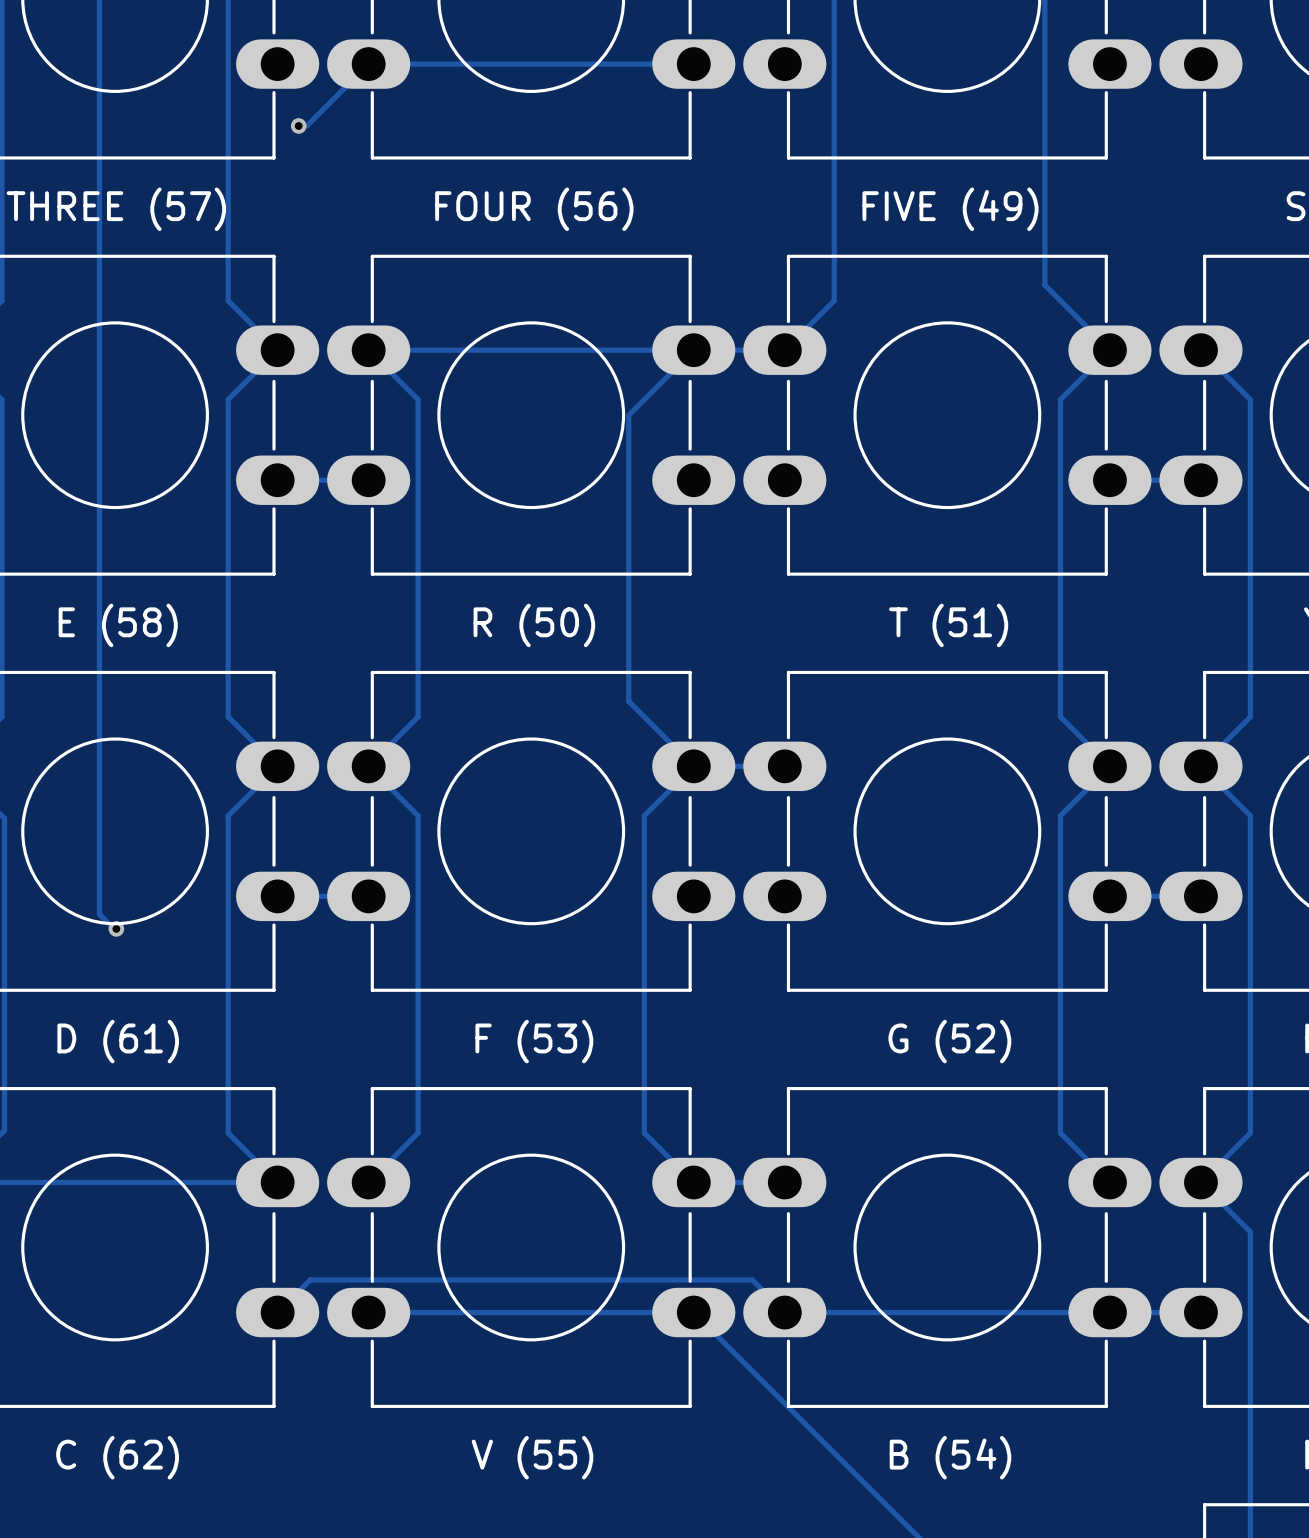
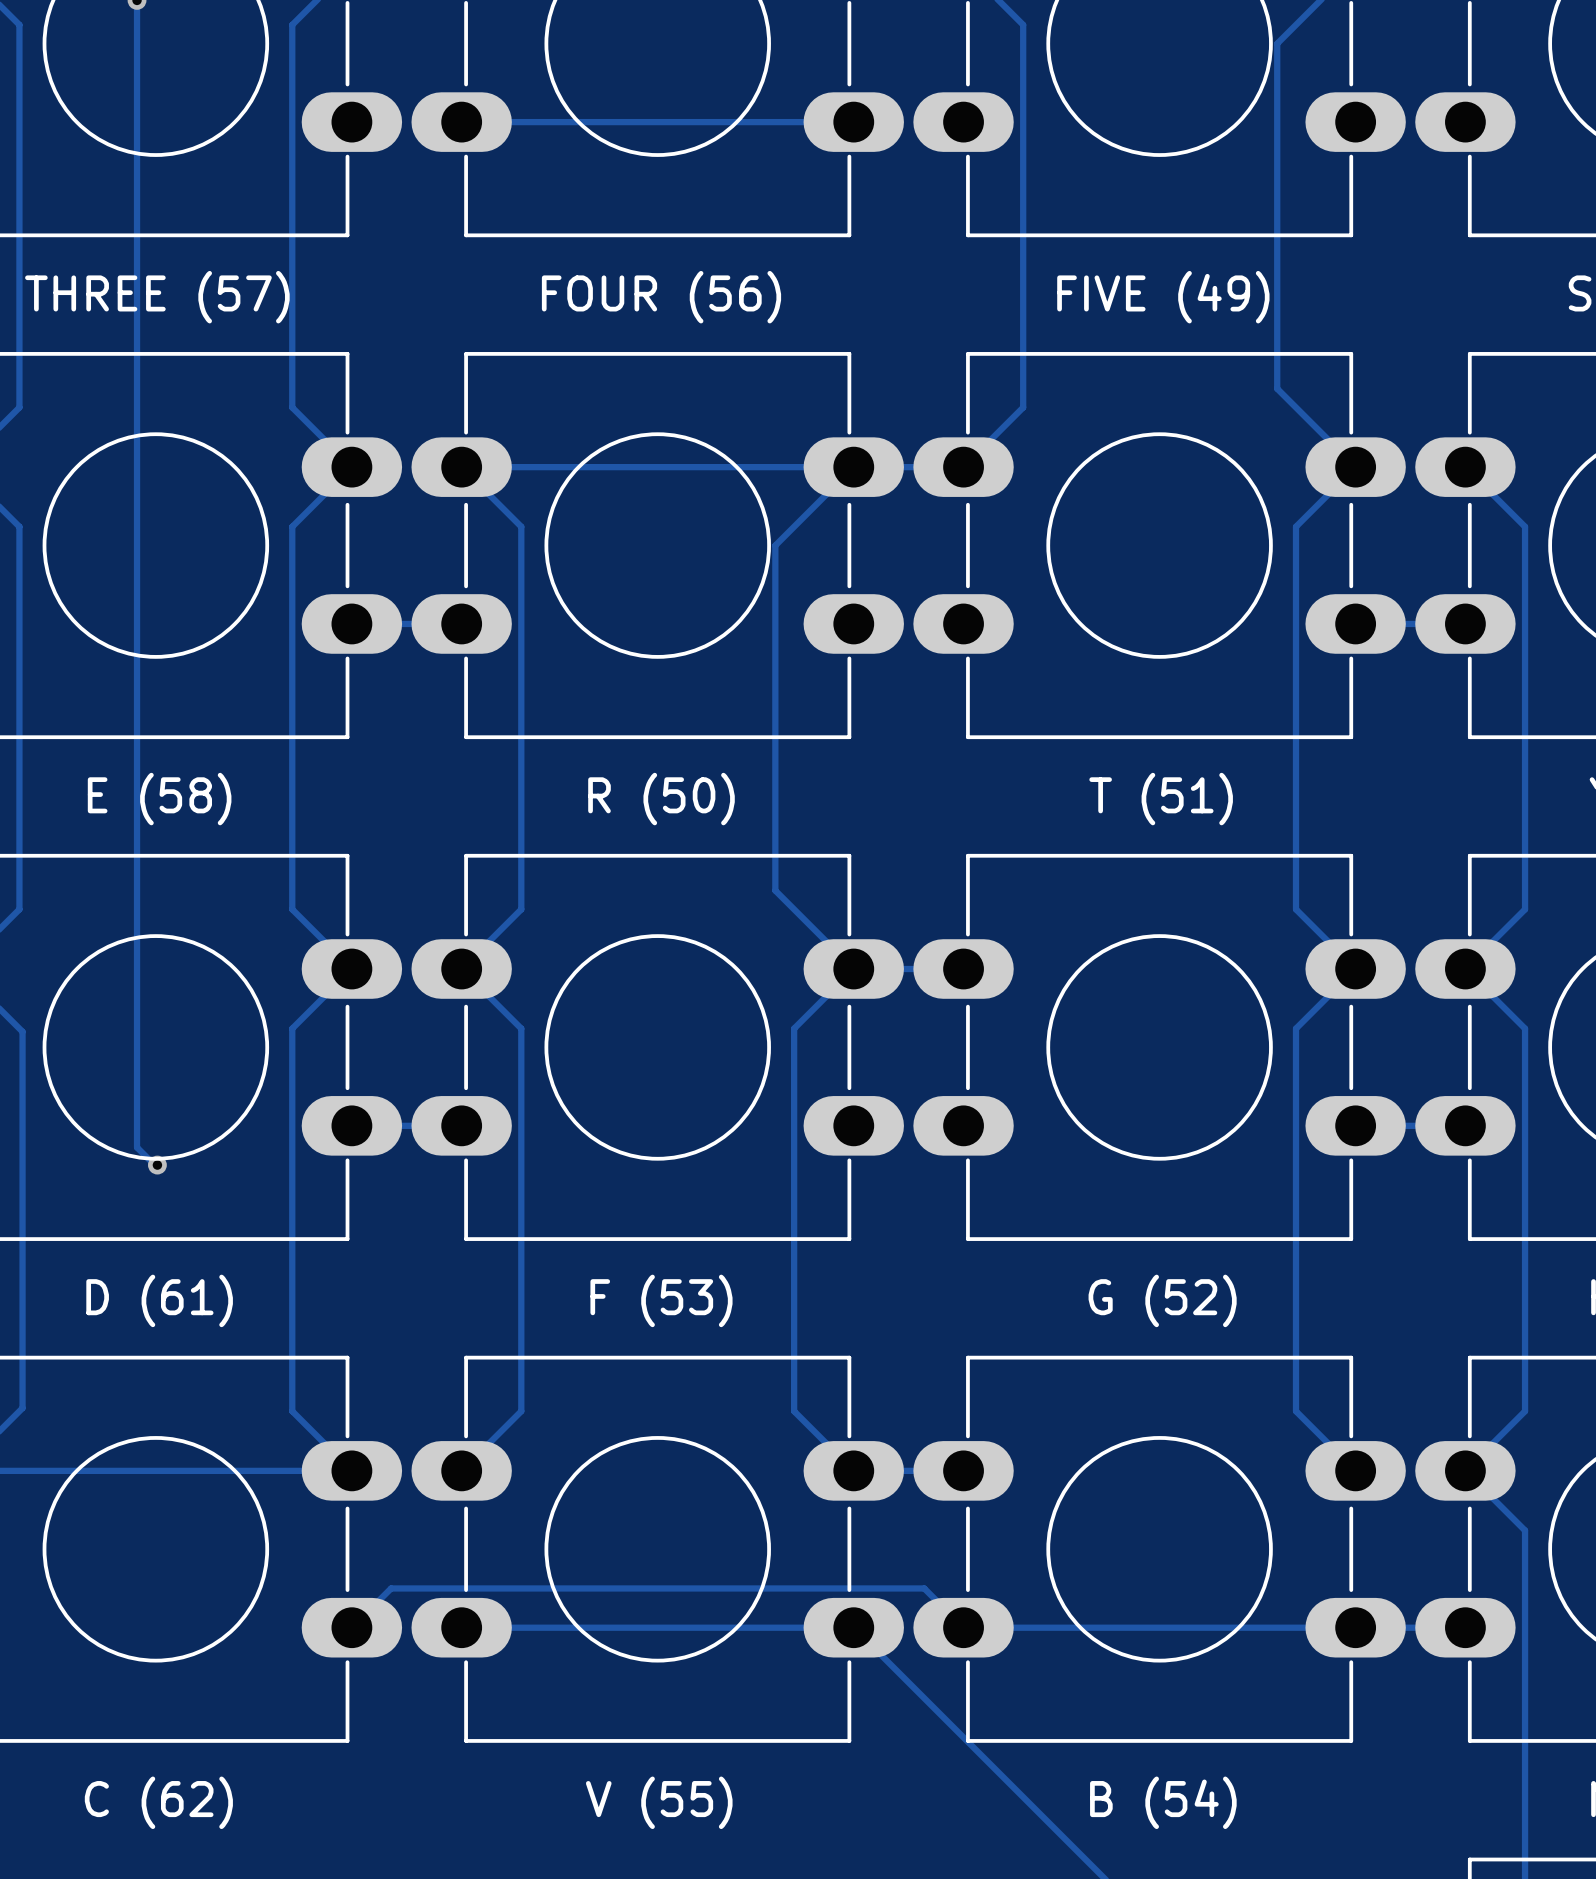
track: (368, 64) (306, 125) (298, 125) -> none
via: (298, 125) -> none

